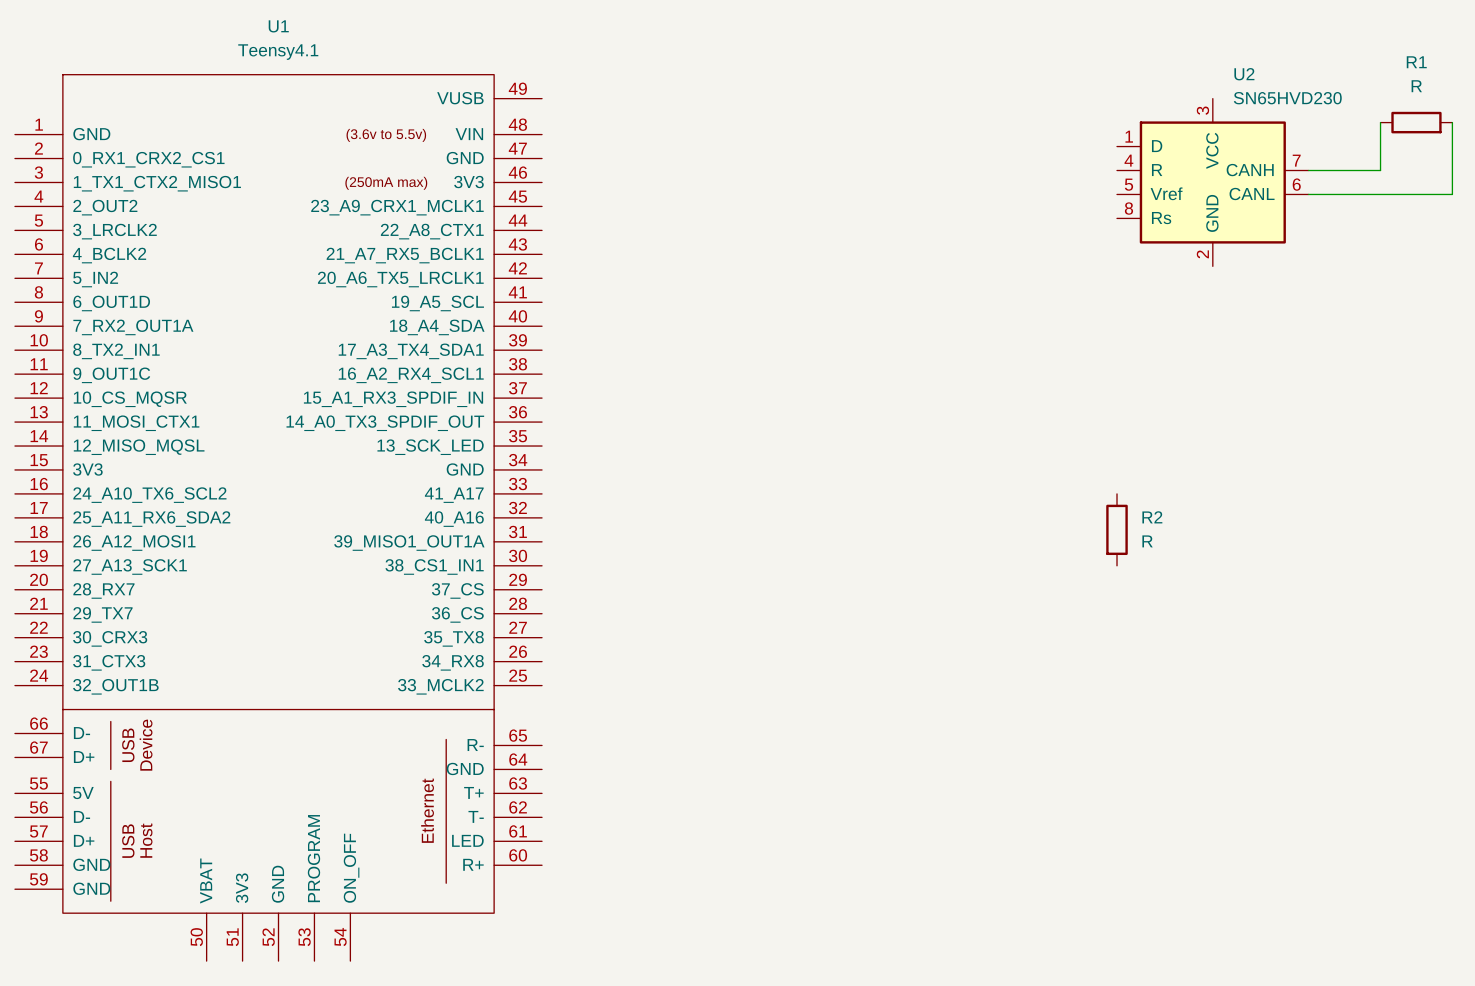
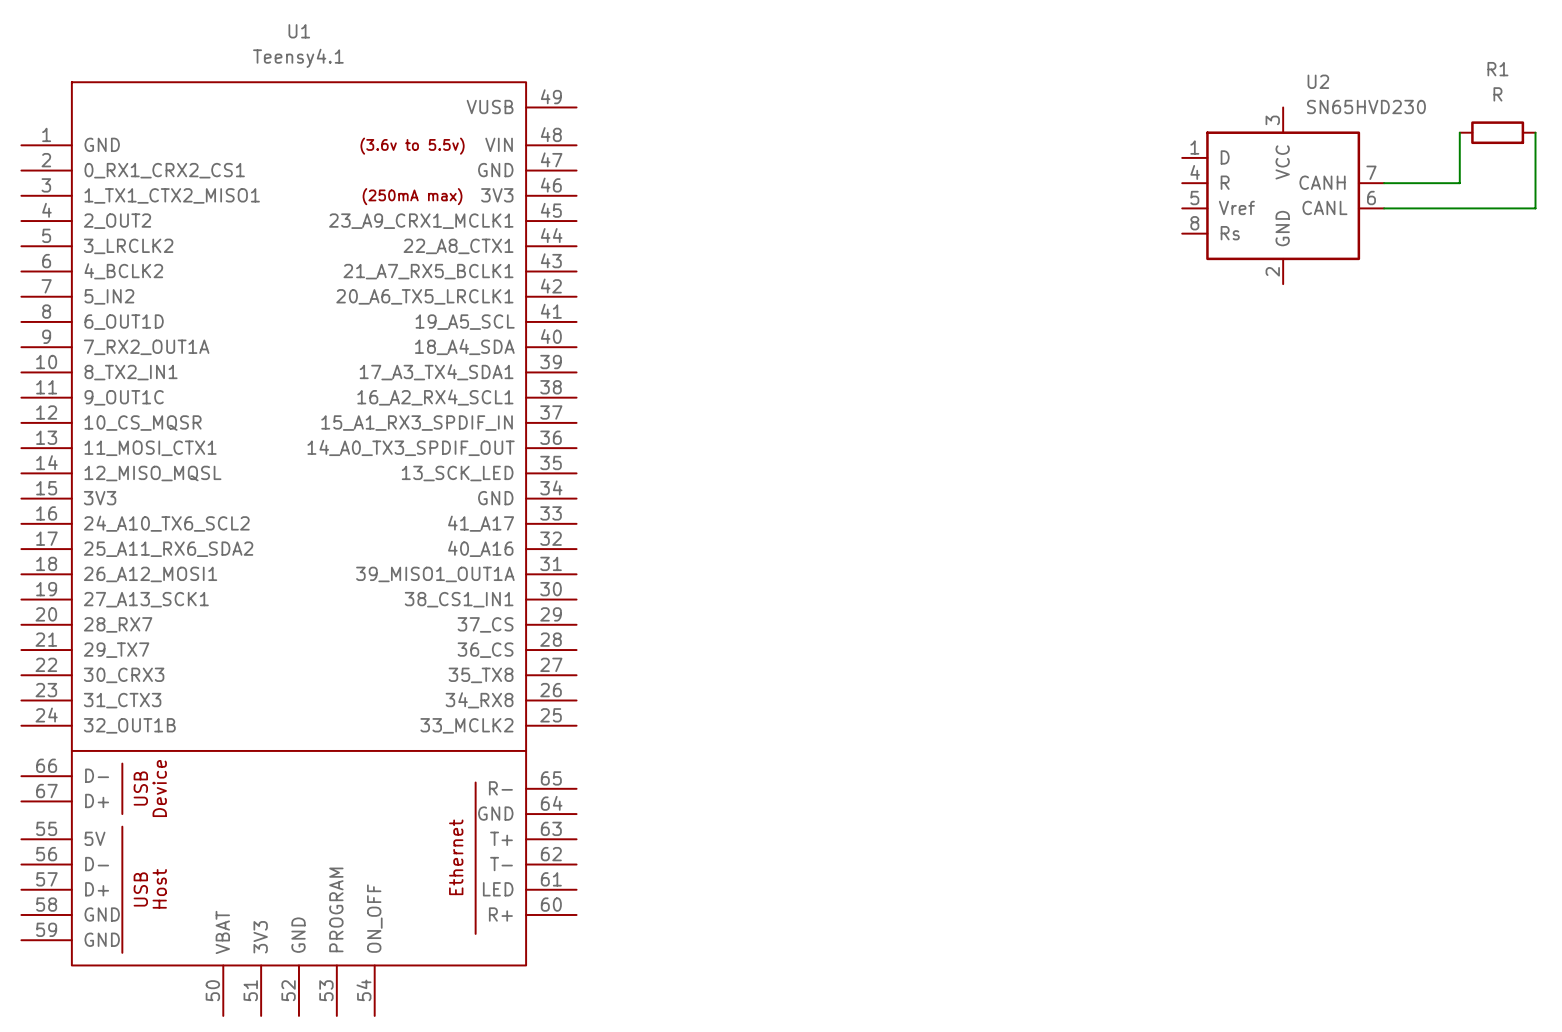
R2: R (1117, 529) -> none

